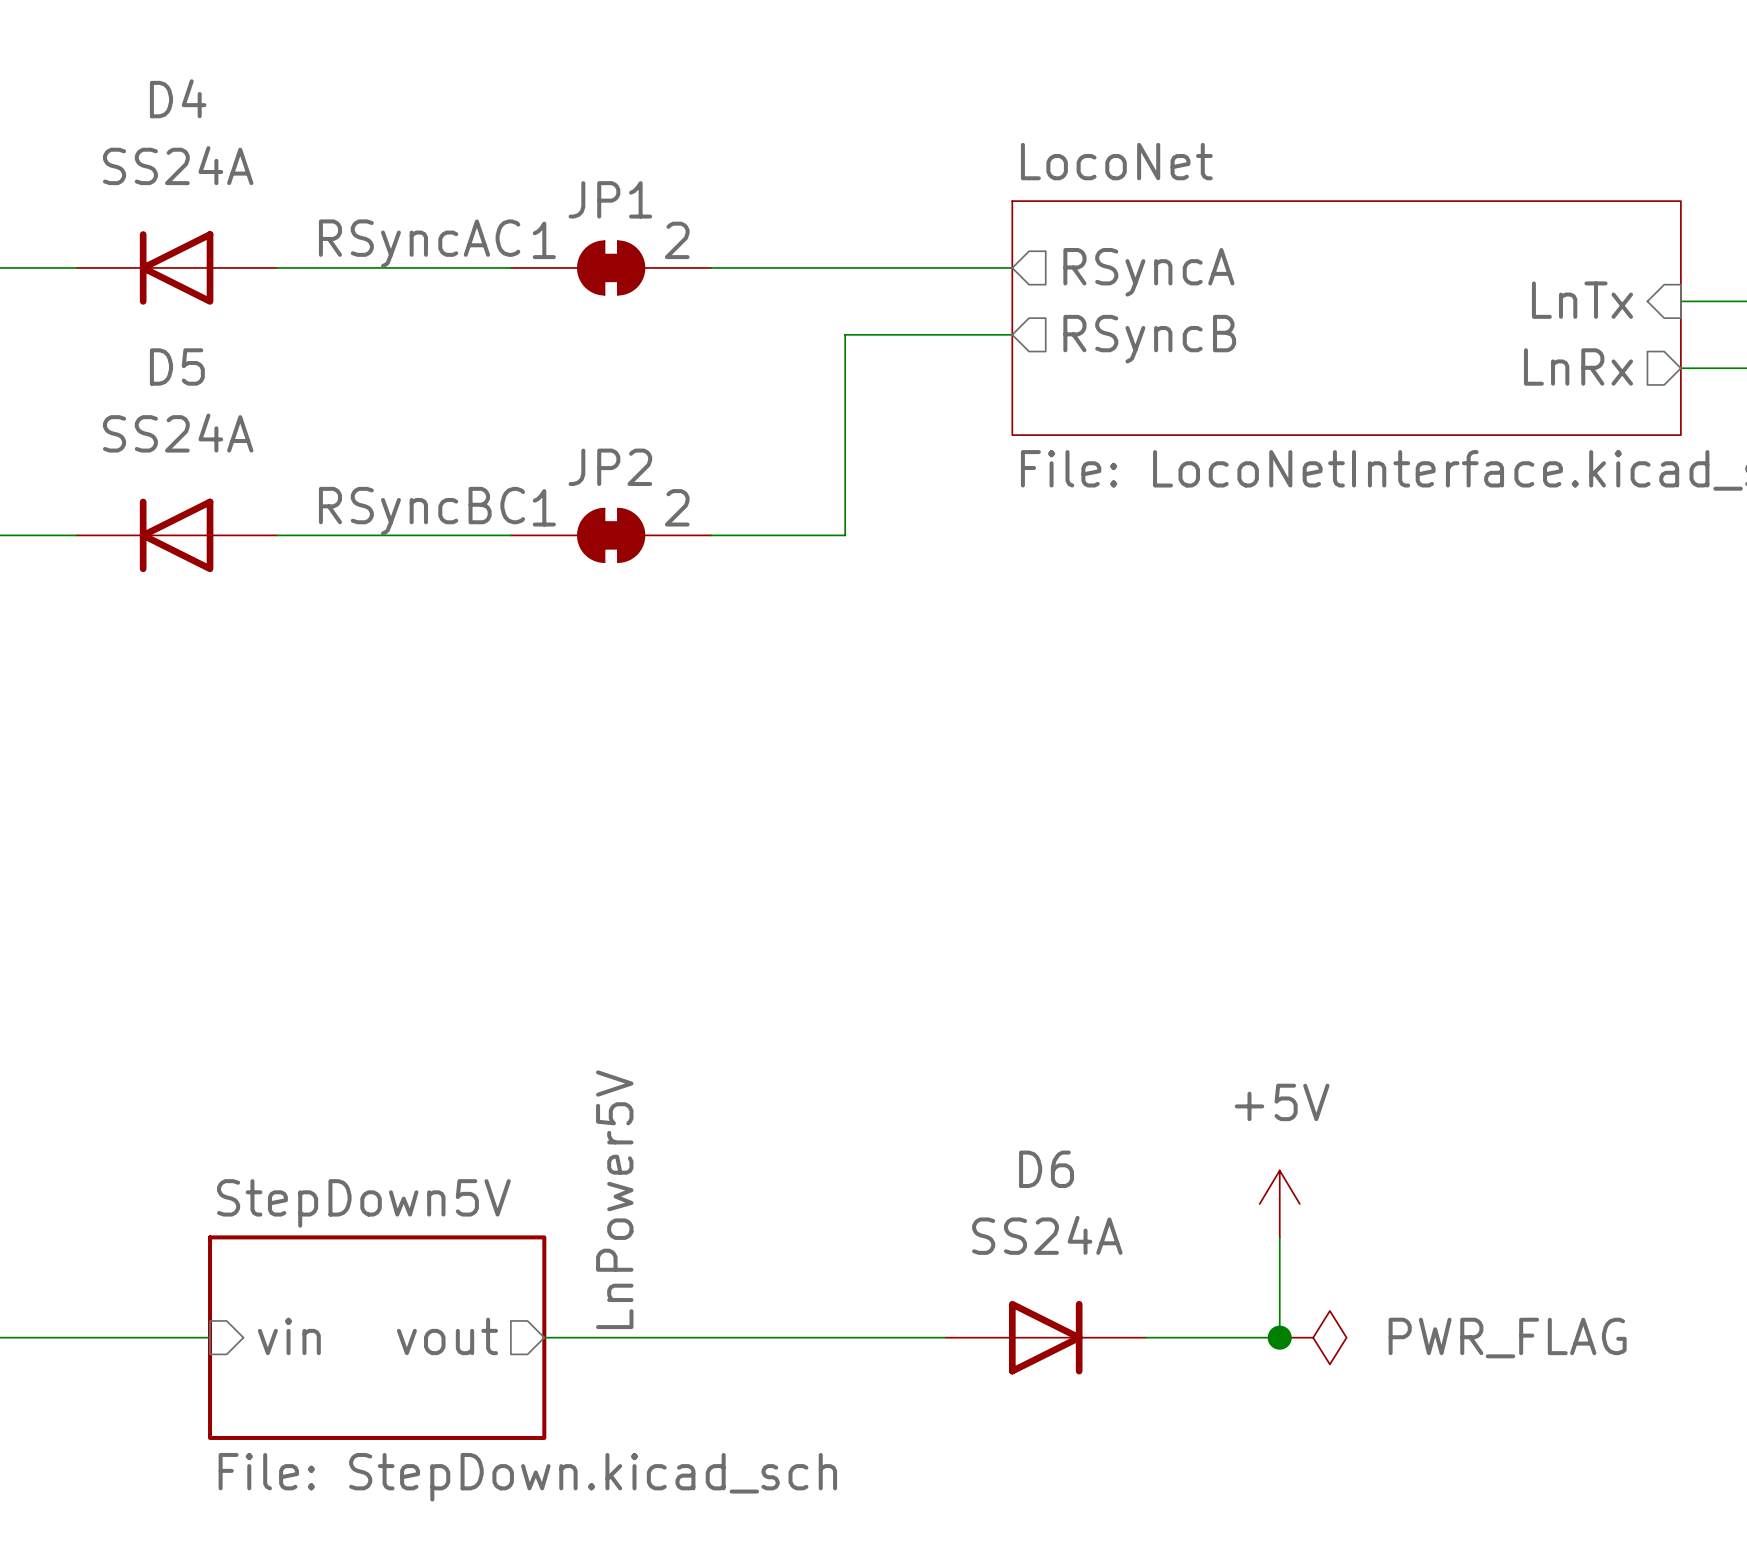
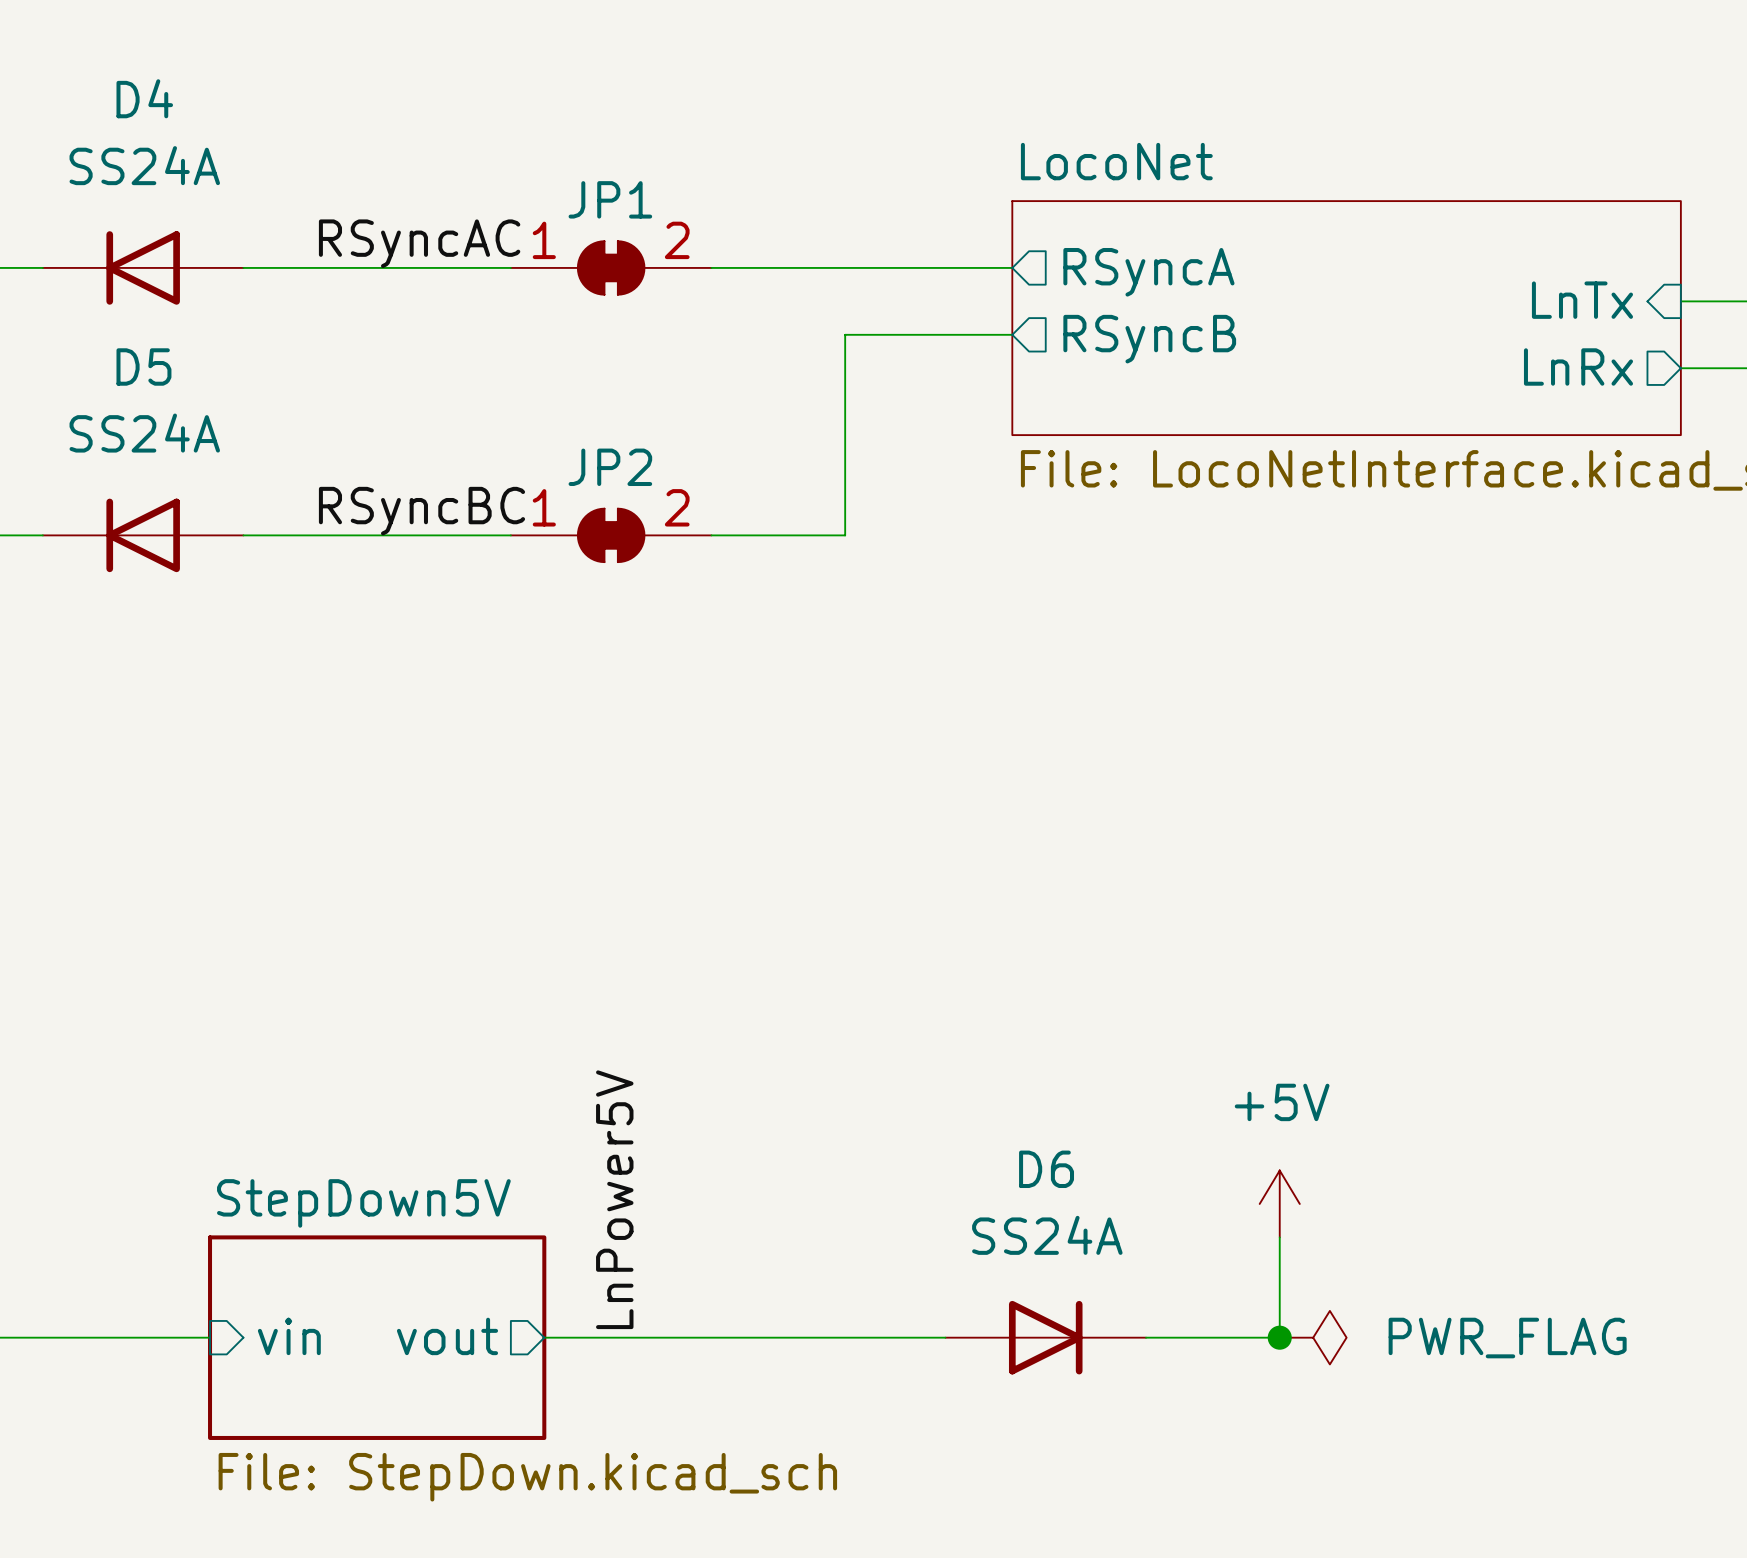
D4 position: (176, 267) -> (143, 267)
D5 position: (176, 535) -> (143, 535)

